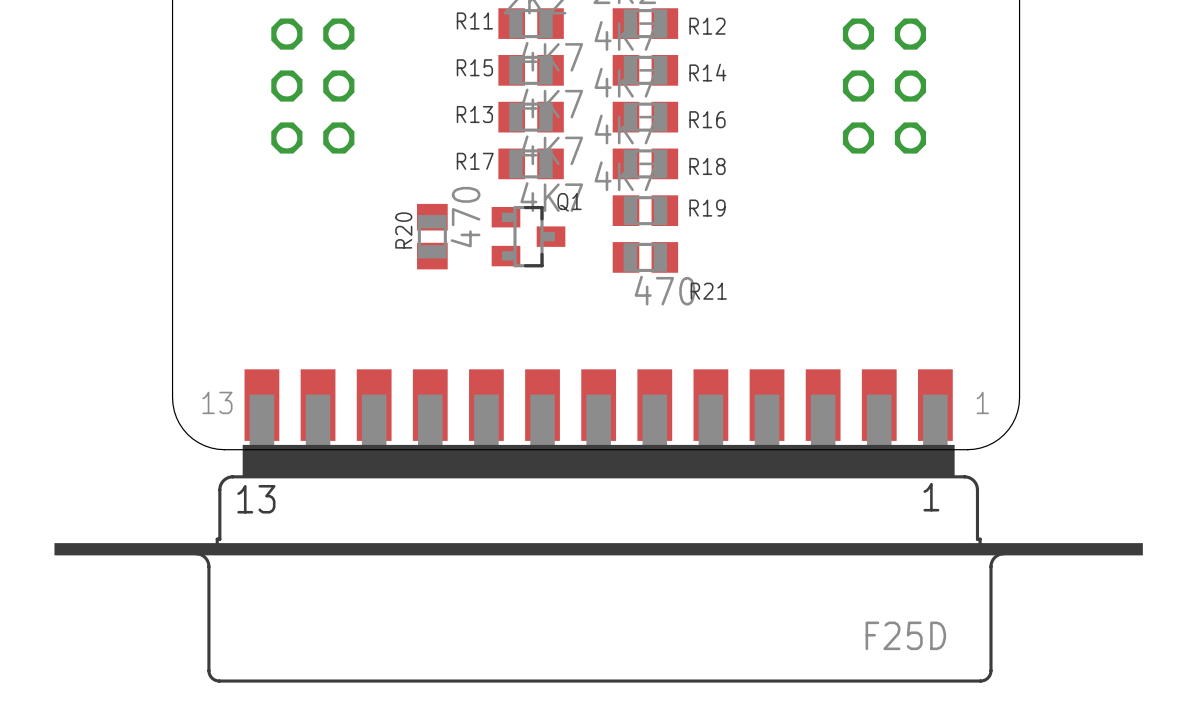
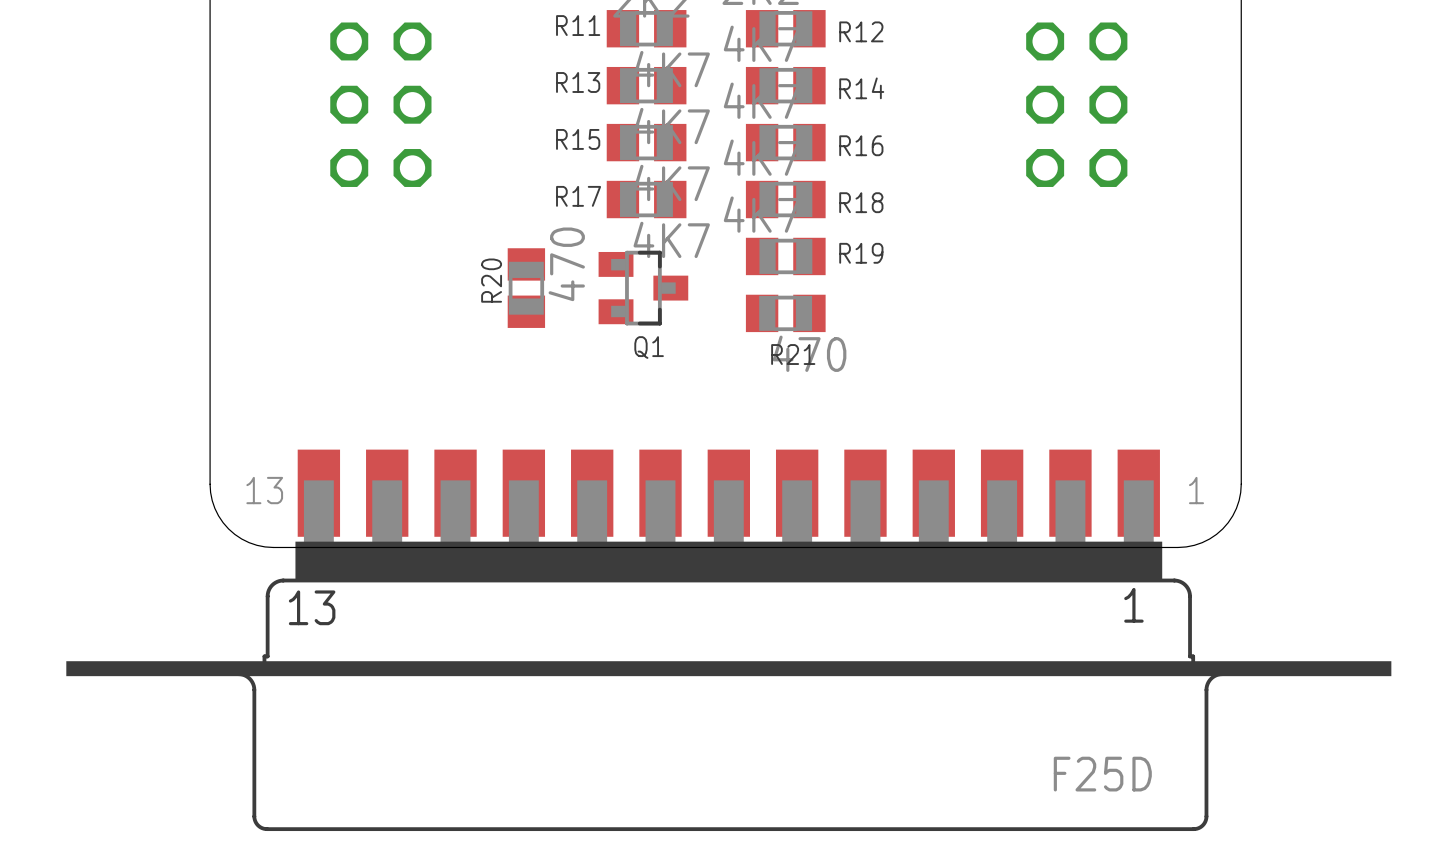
R15 name: R15 (474, 67) -> R13 (578, 82)
R13 name: R13 (474, 114) -> R15 (578, 139)
Q1 name position: Q1 (569, 202) -> Q1 (649, 347)
R21 name position: R21 (708, 291) -> R21 (793, 354)

